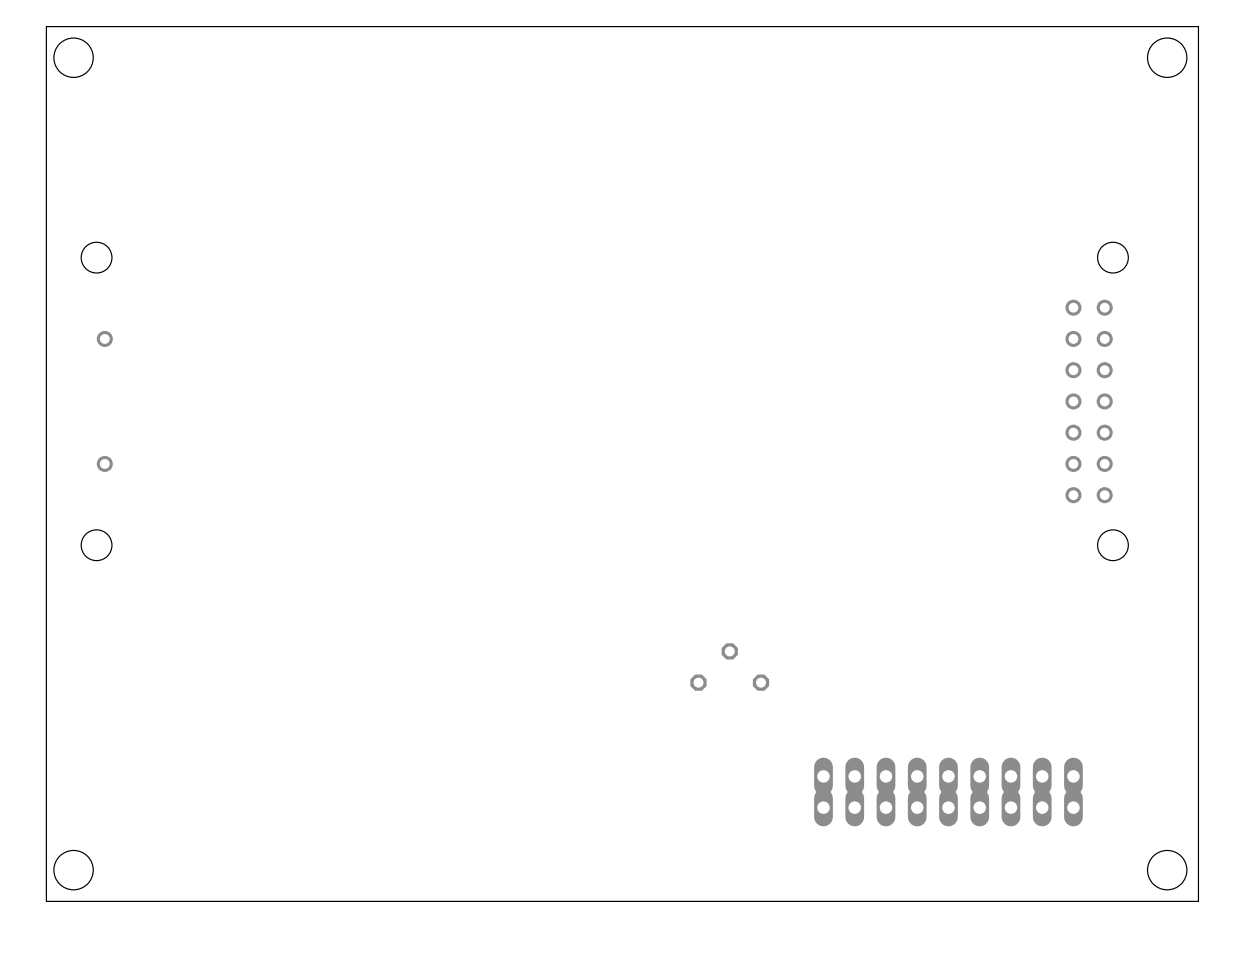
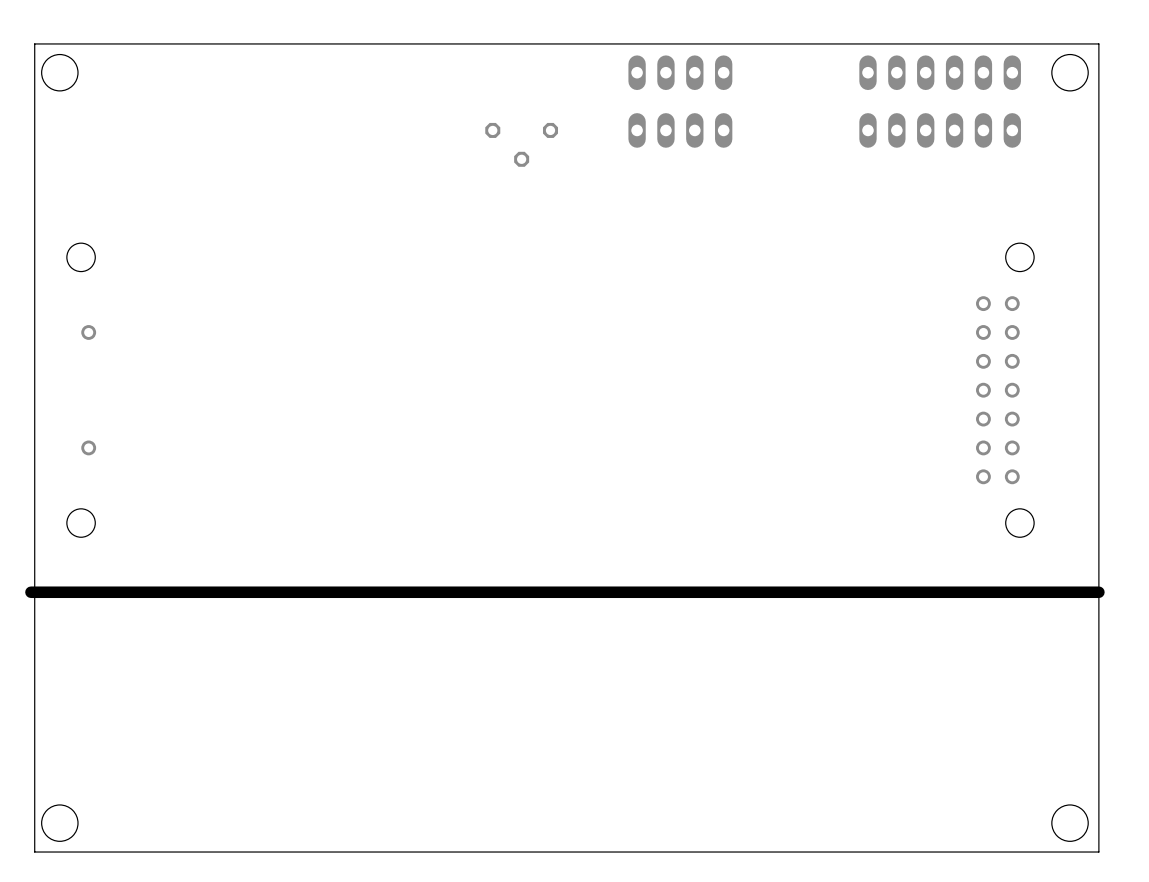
part: none -> (680, 72)
part: none -> (940, 72)
part: none -> (680, 130)
part: none -> (940, 130)
part: none -> (521, 144)
board edge: none -> (1098, 592) (30, 592)
part: (729, 667) -> none
part: (948, 776) -> none
part: (948, 807) -> none

